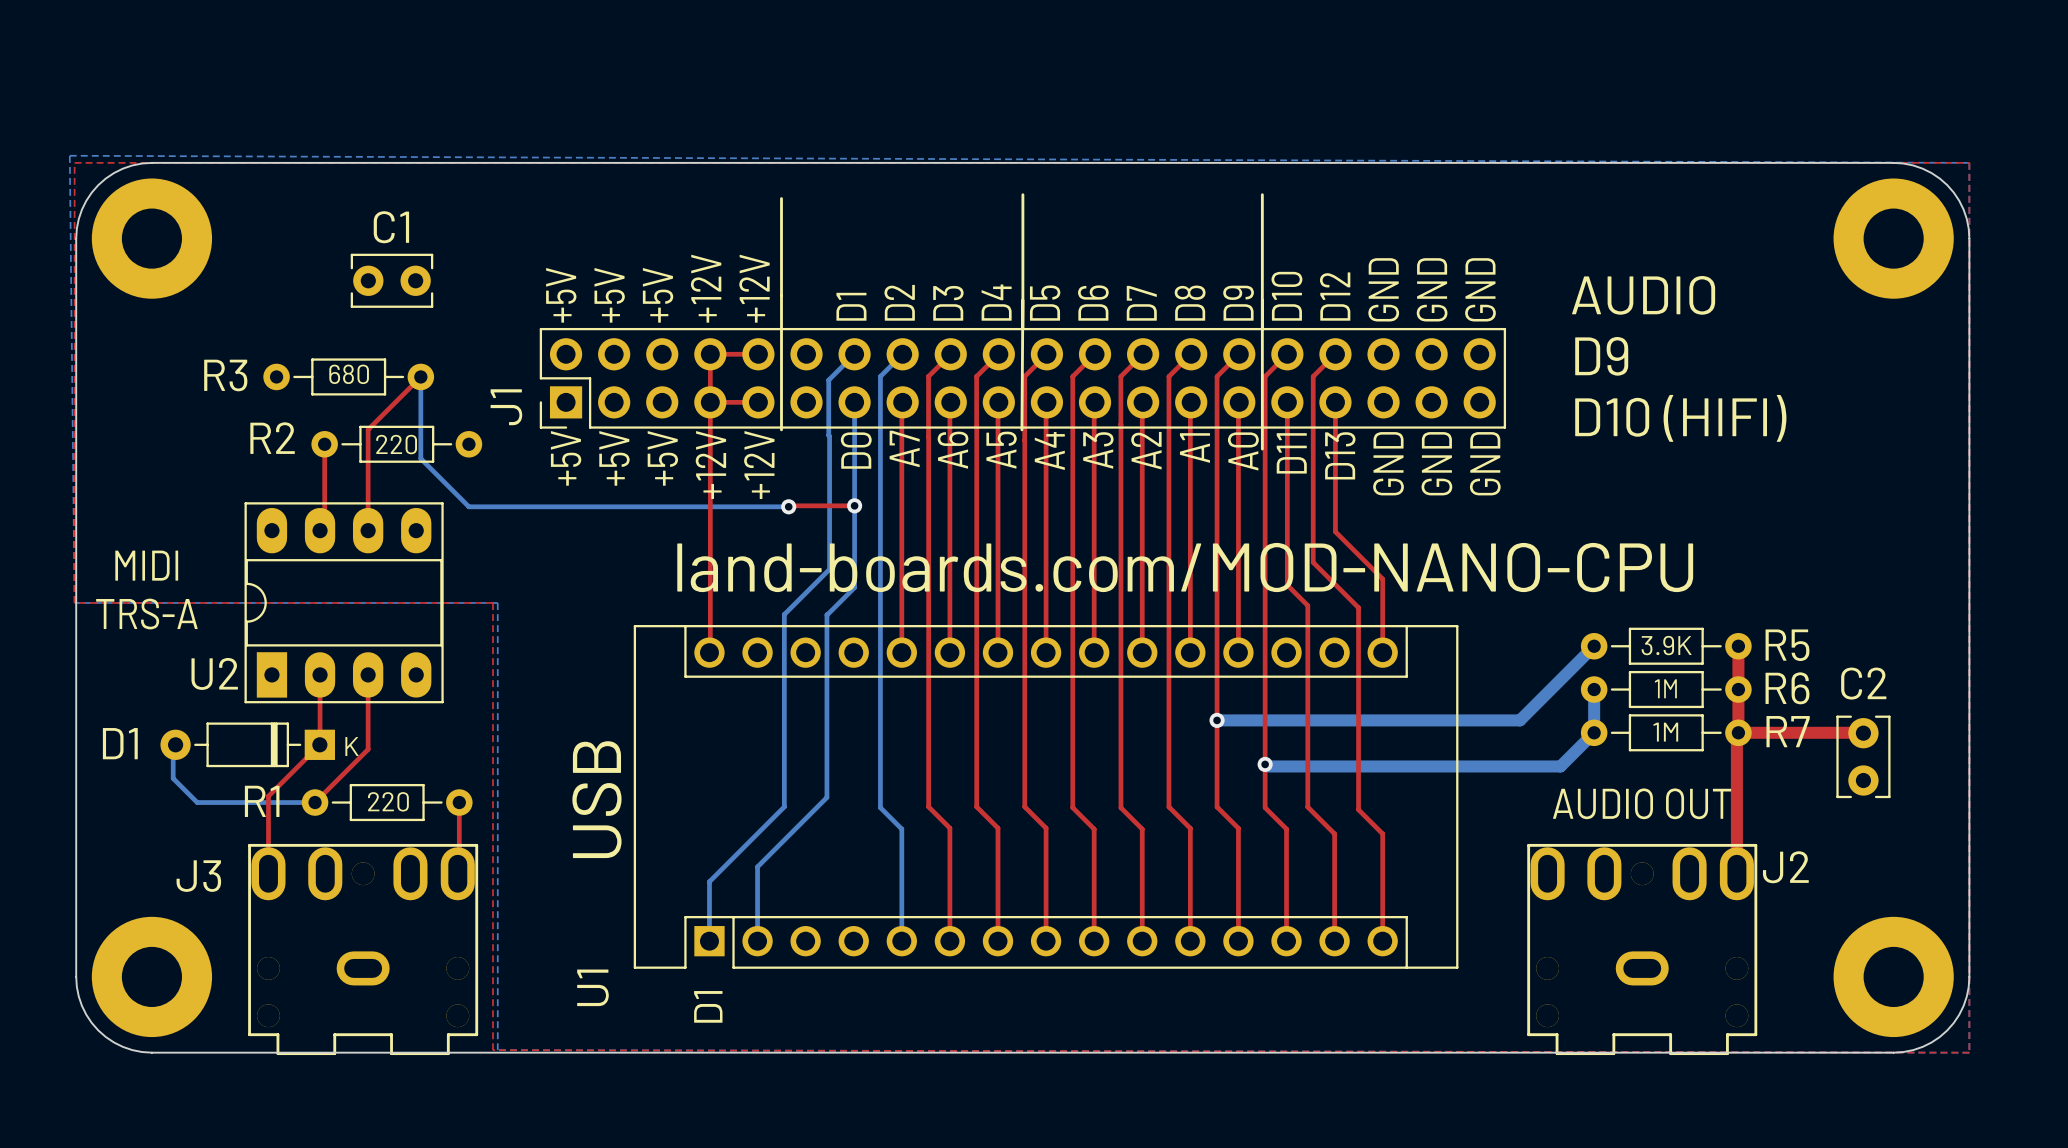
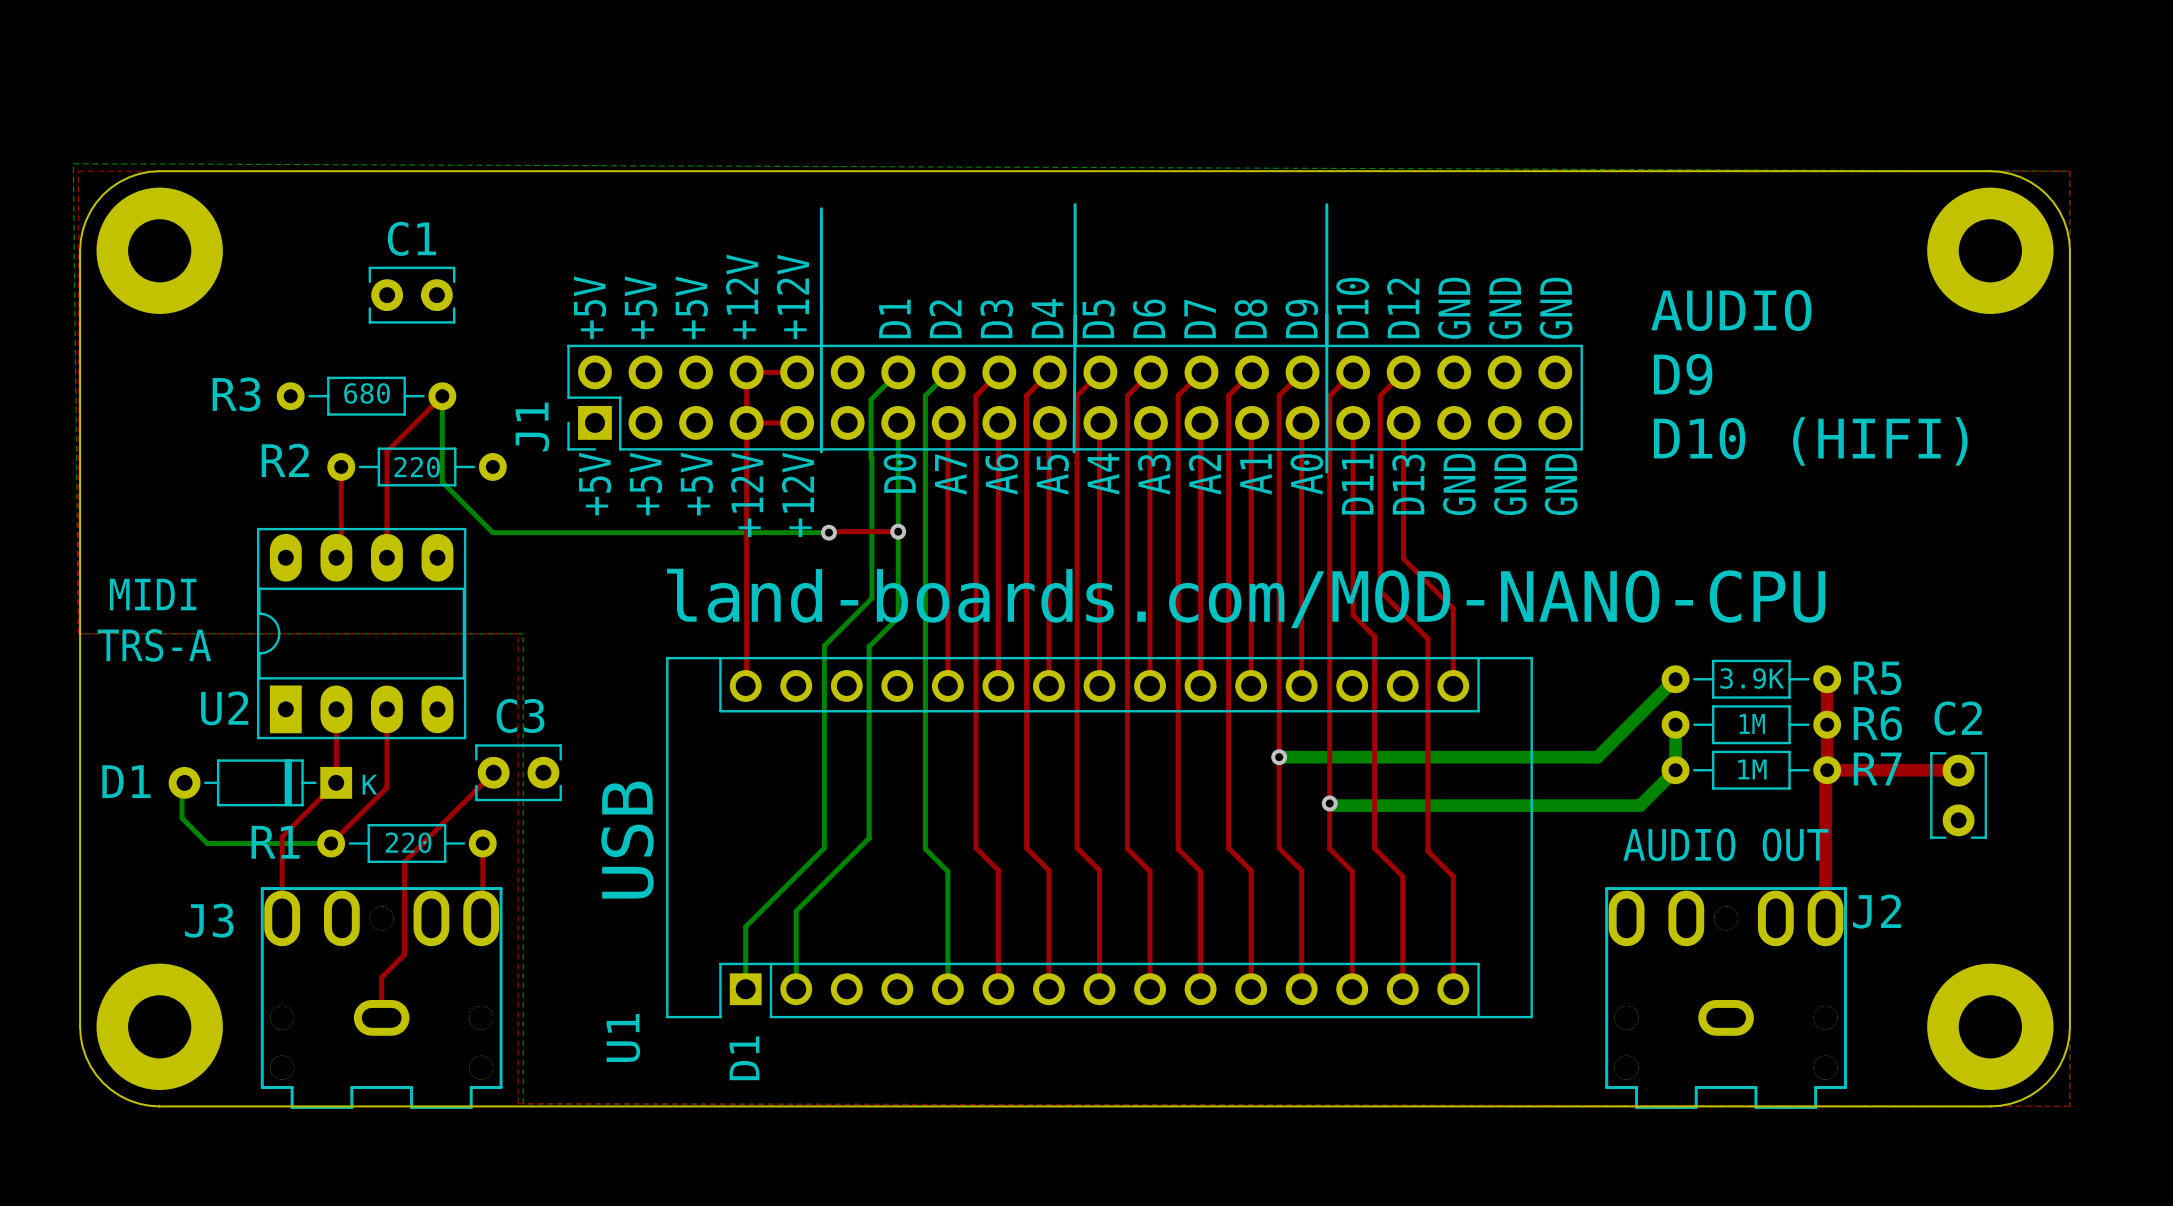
top track: none -> (493, 772) (404, 861) (404, 954) (381, 977) (381, 1017)
C3: none -> (518, 772)

